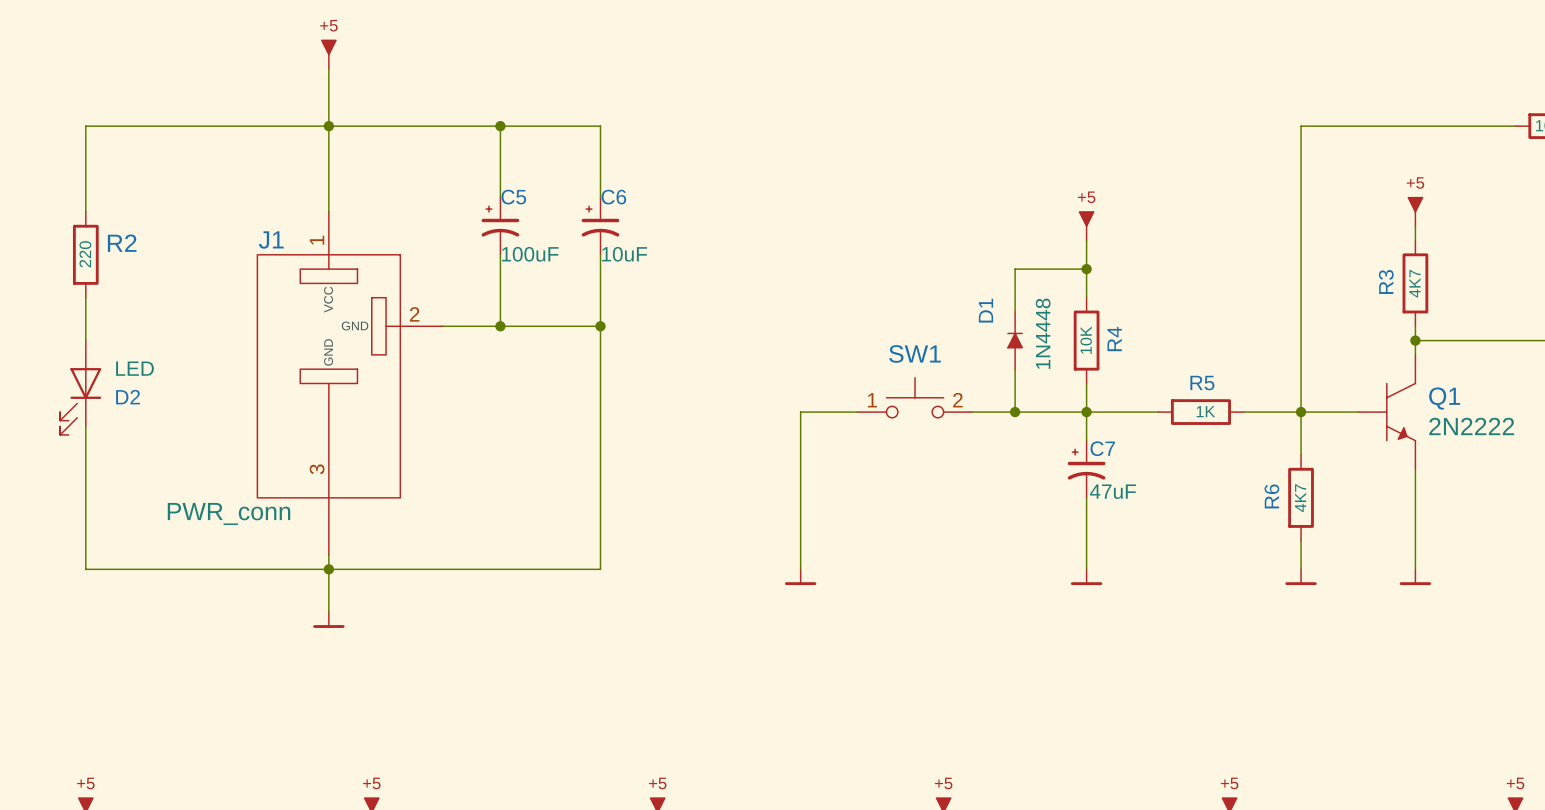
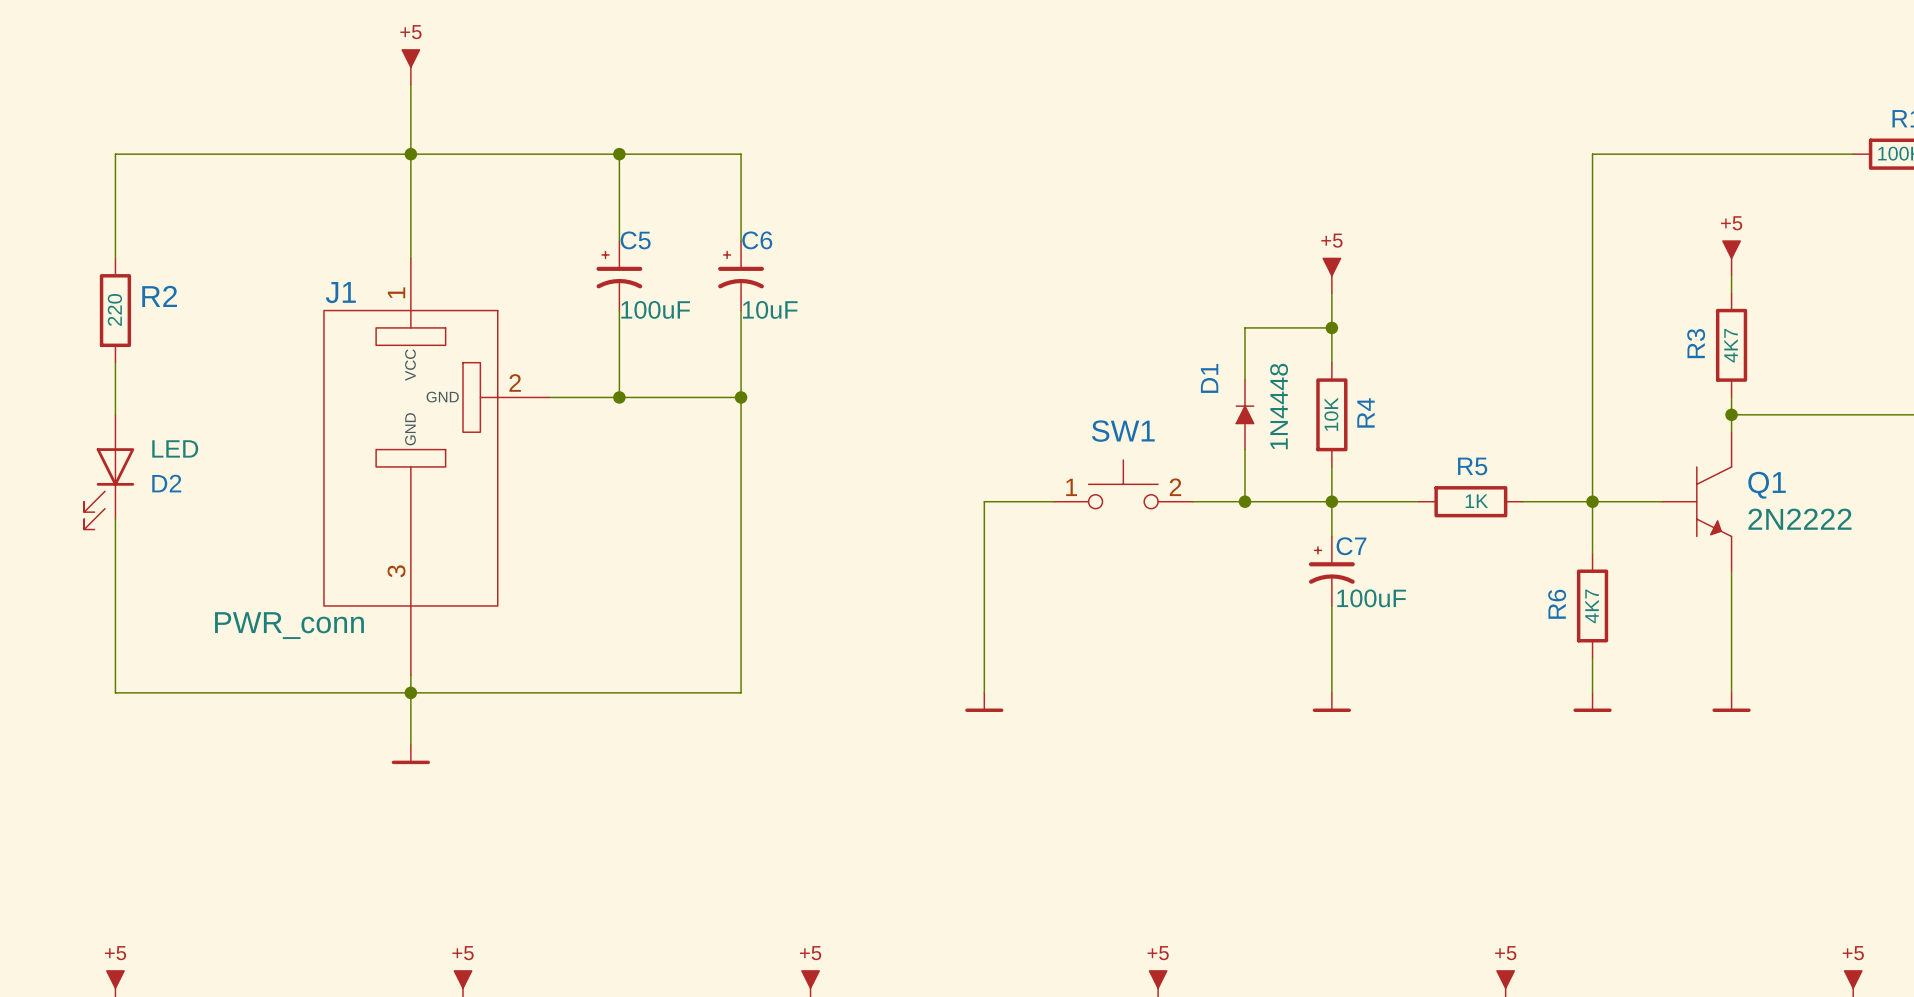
C7 value: 47uF (1112, 491) -> 100uF (1371, 598)

